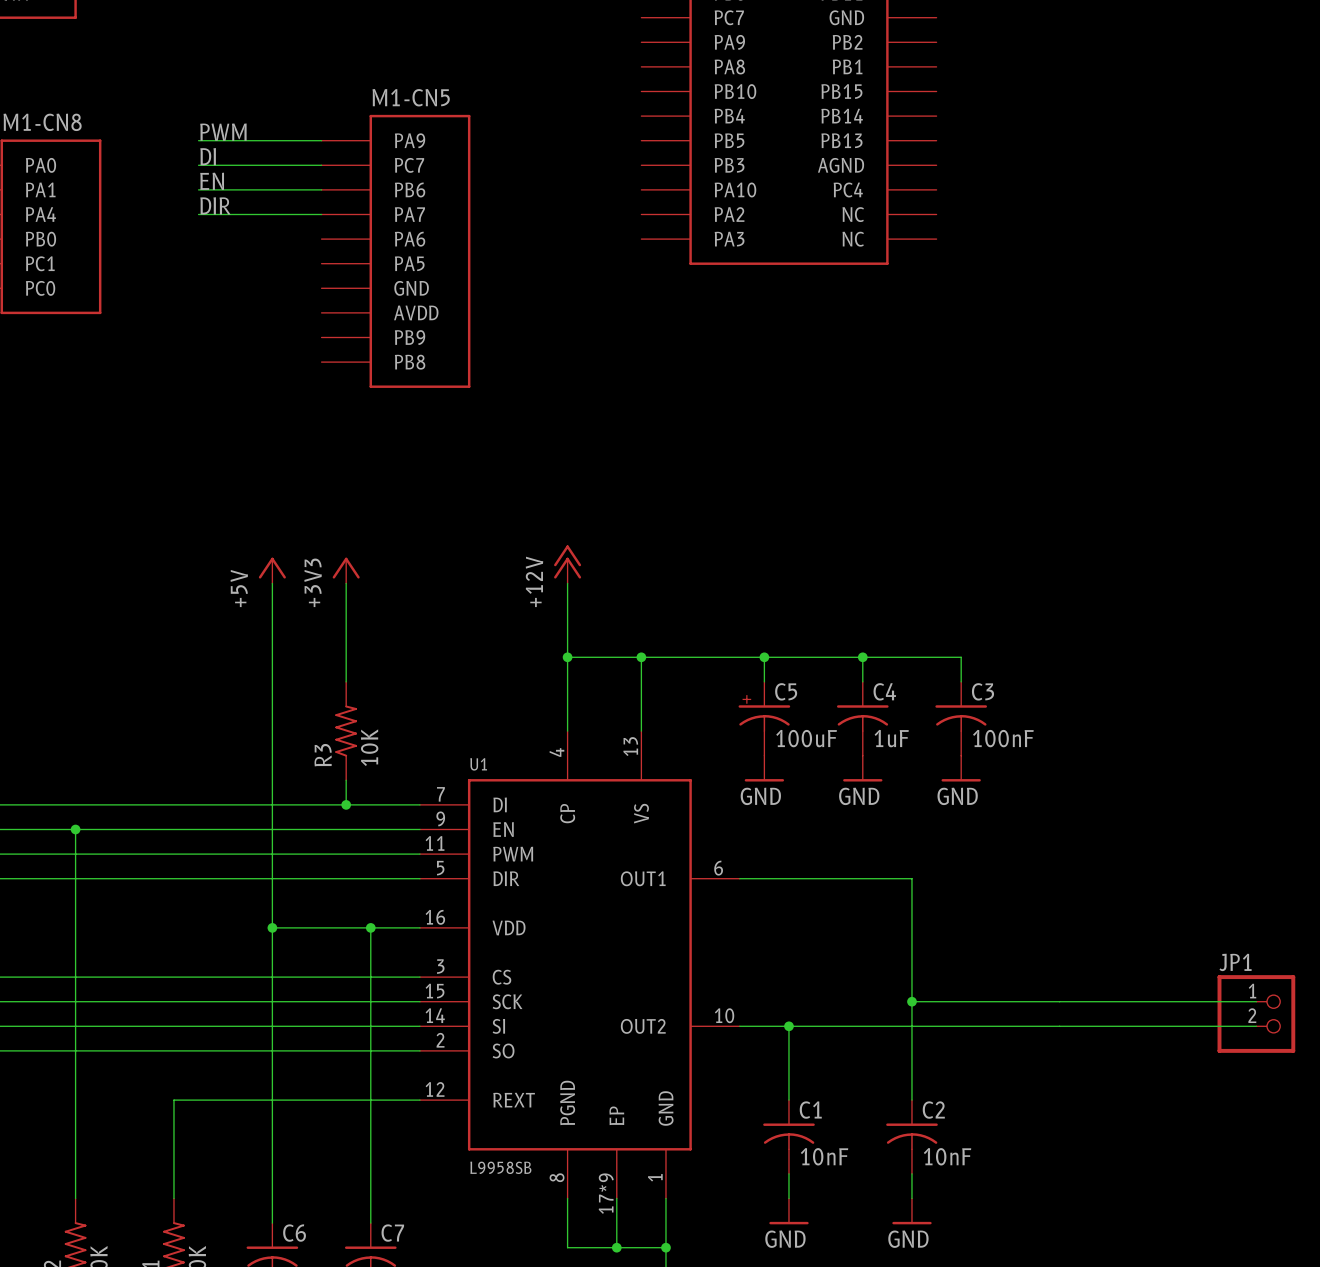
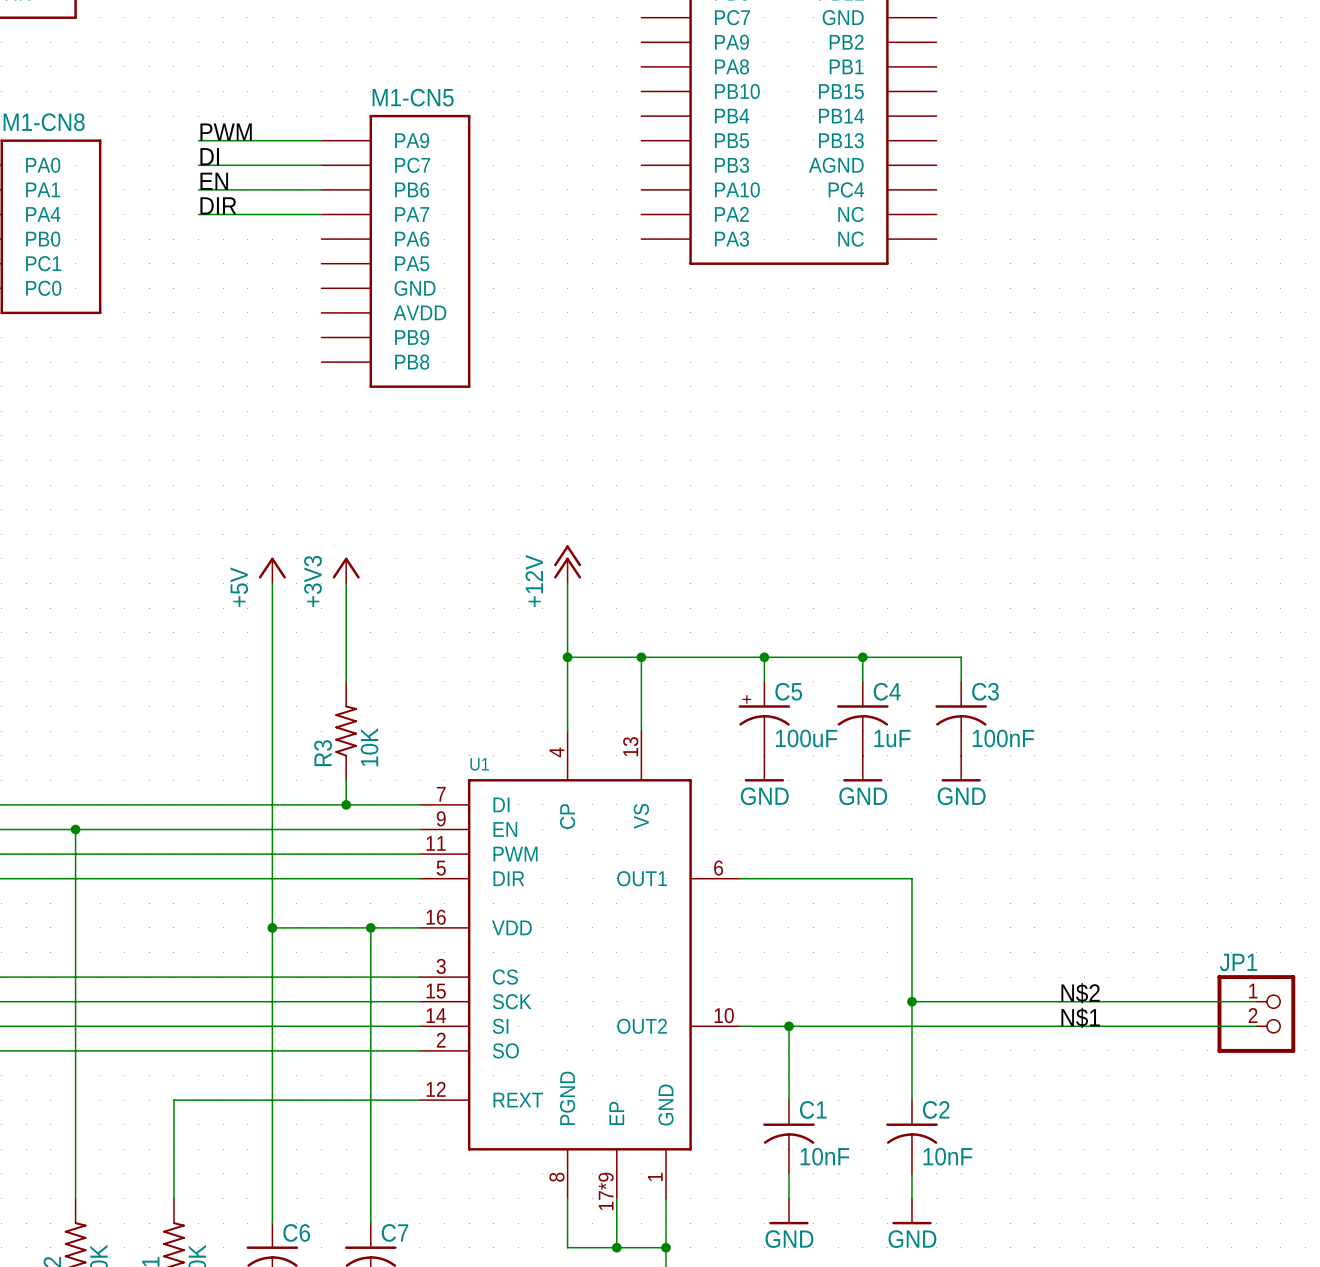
label: none -> N$2 (1080, 993)
label: none -> N$1 (1080, 1017)
U1 value: L9958SB (500, 1167) -> none

